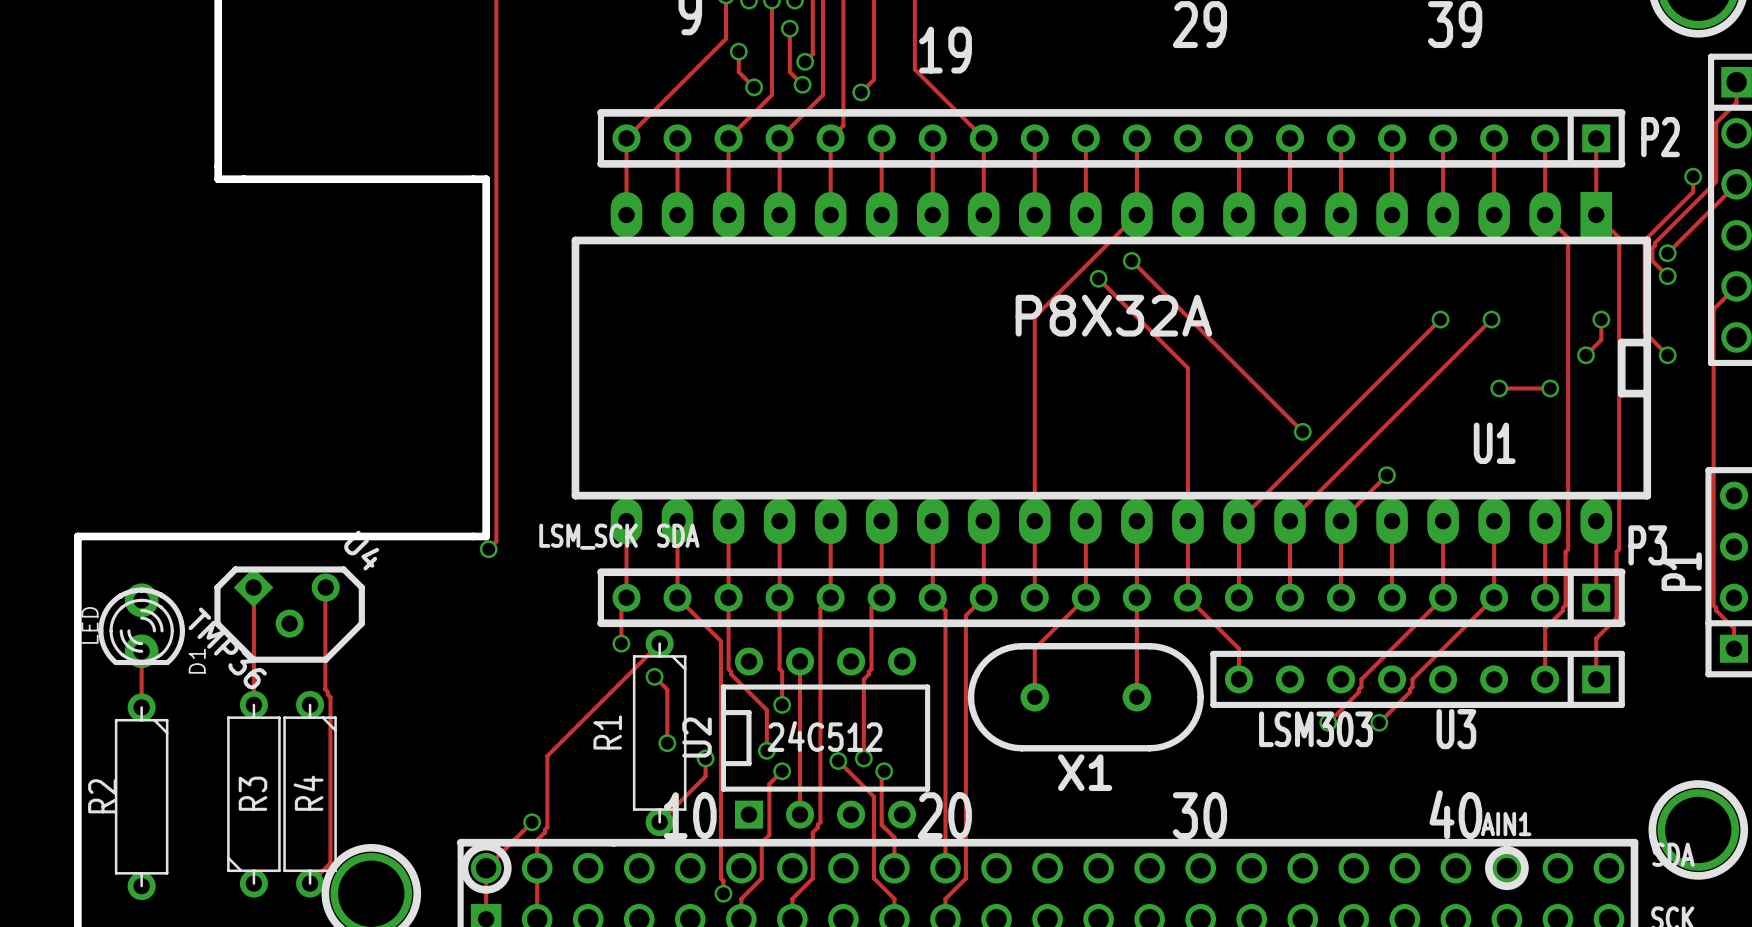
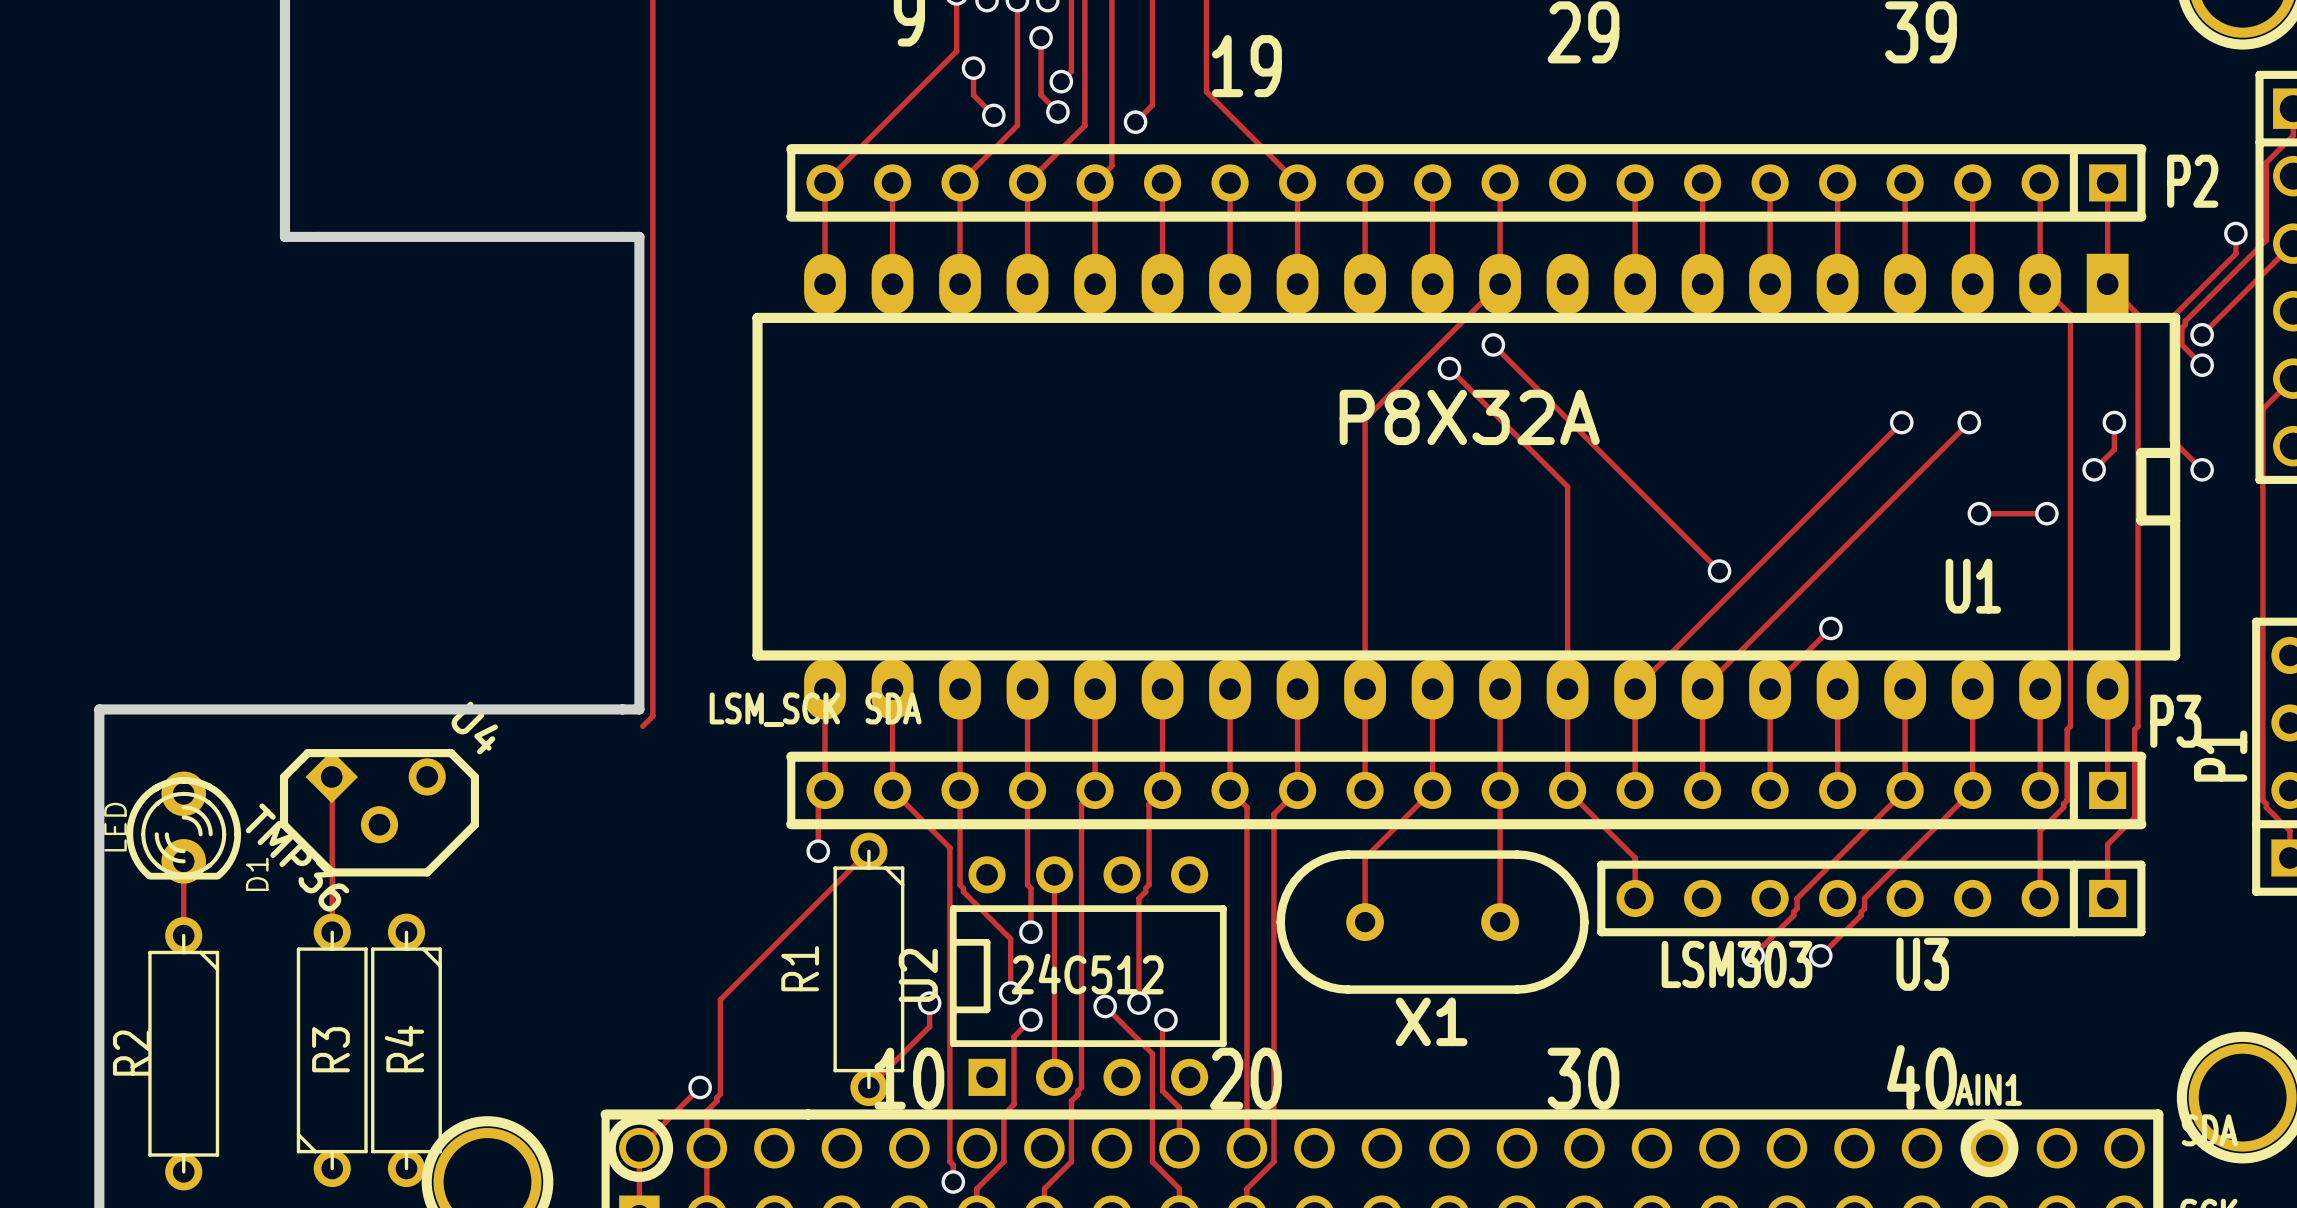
via: (488, 549) -> none
track: (325, 587) (325, 689) (330, 697) (330, 863) (310, 883) -> none
track: (654, 676) (667, 689) (667, 743) -> none
via: (654, 676) -> none
via: (667, 743) -> none

